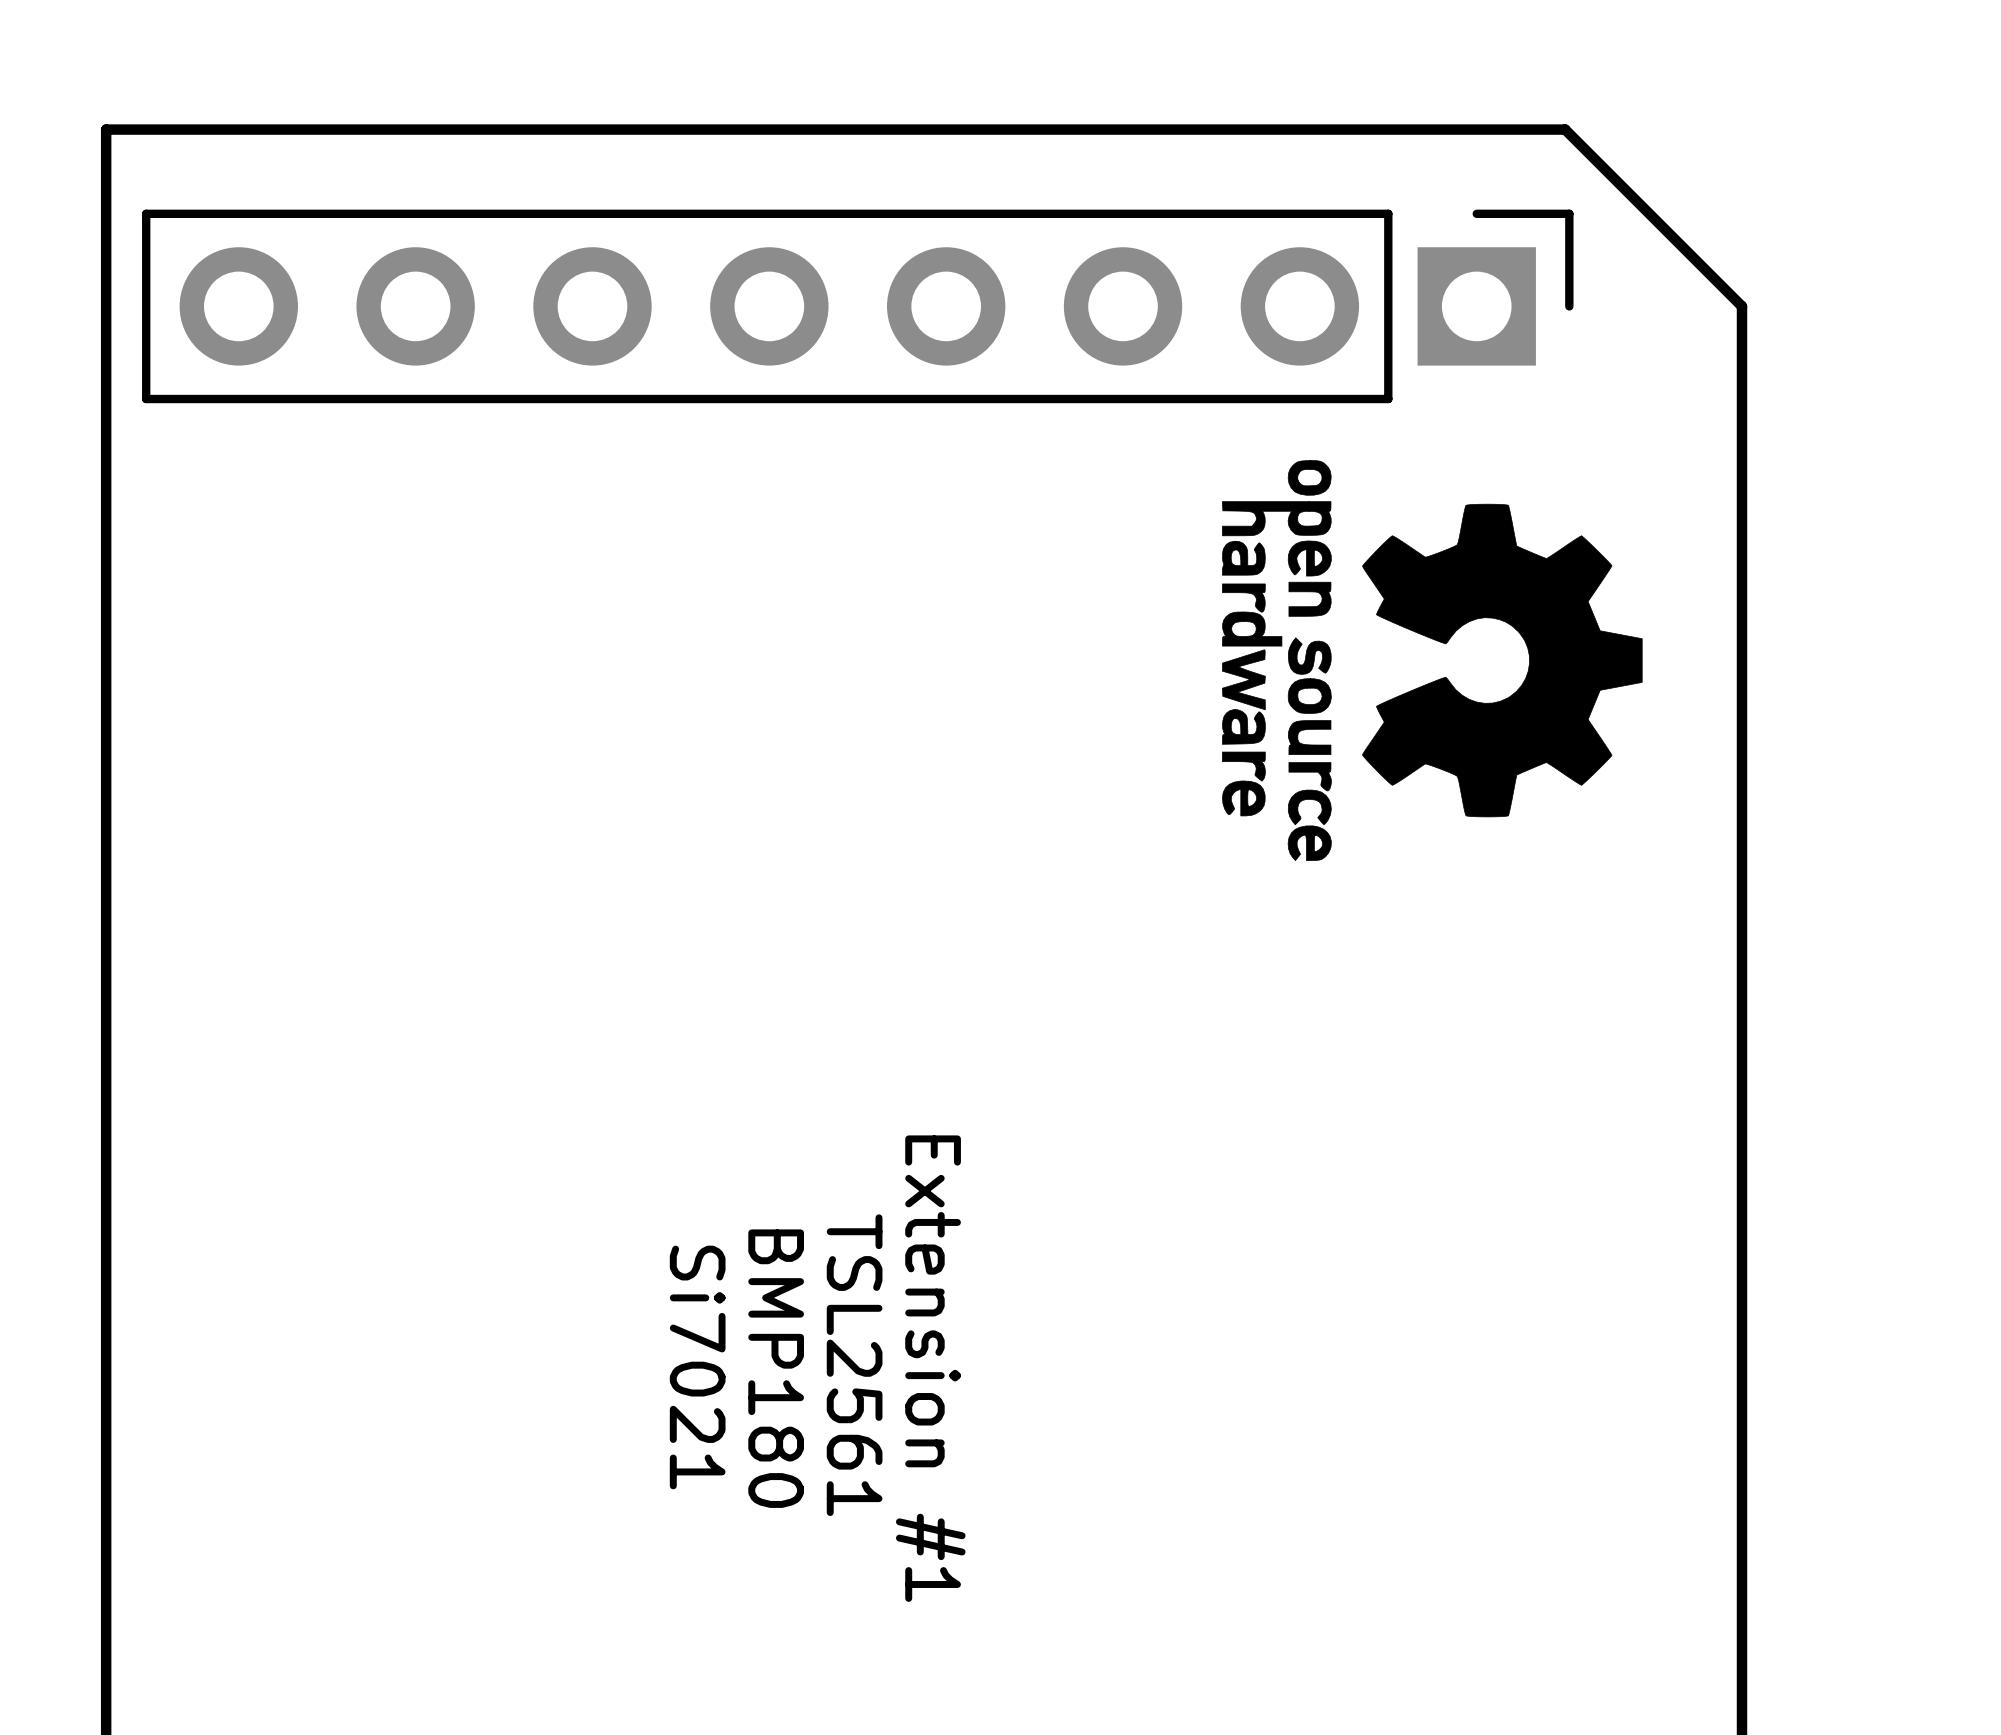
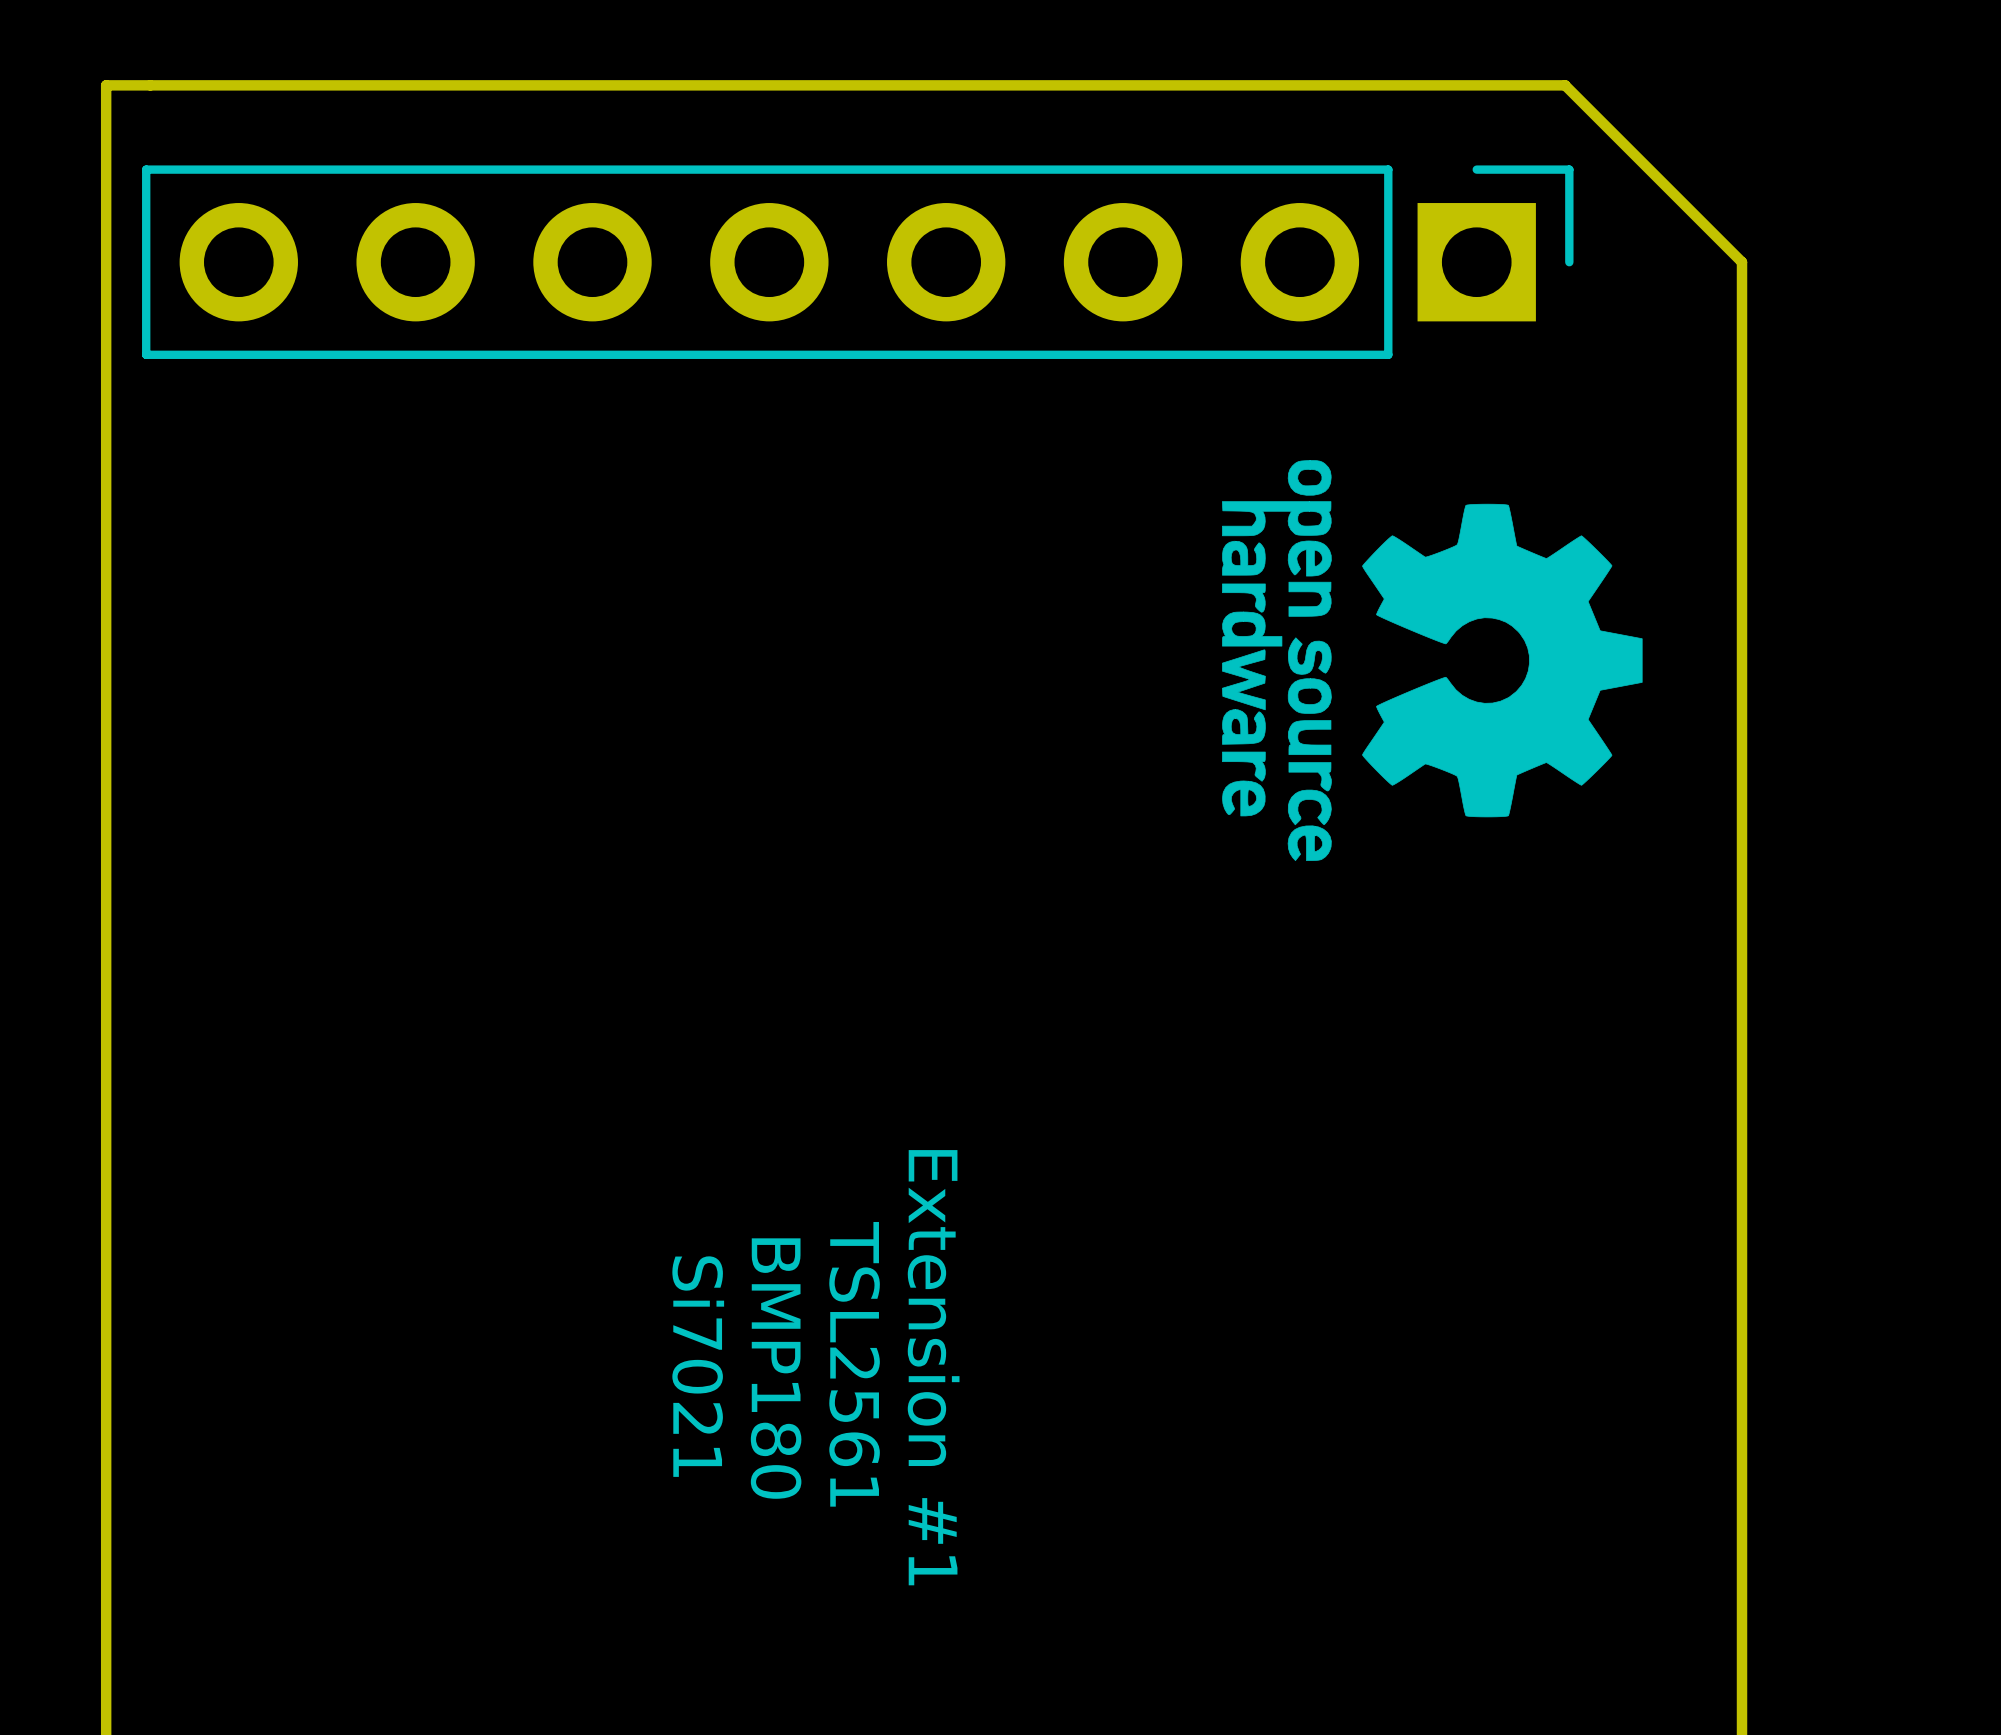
board edge: (106, 129) (1565, 129) (1742, 306) -> (106, 129) (106, 85) (1565, 85) (1742, 262) (1742, 306)
part position: (857, 306) -> (857, 262)

